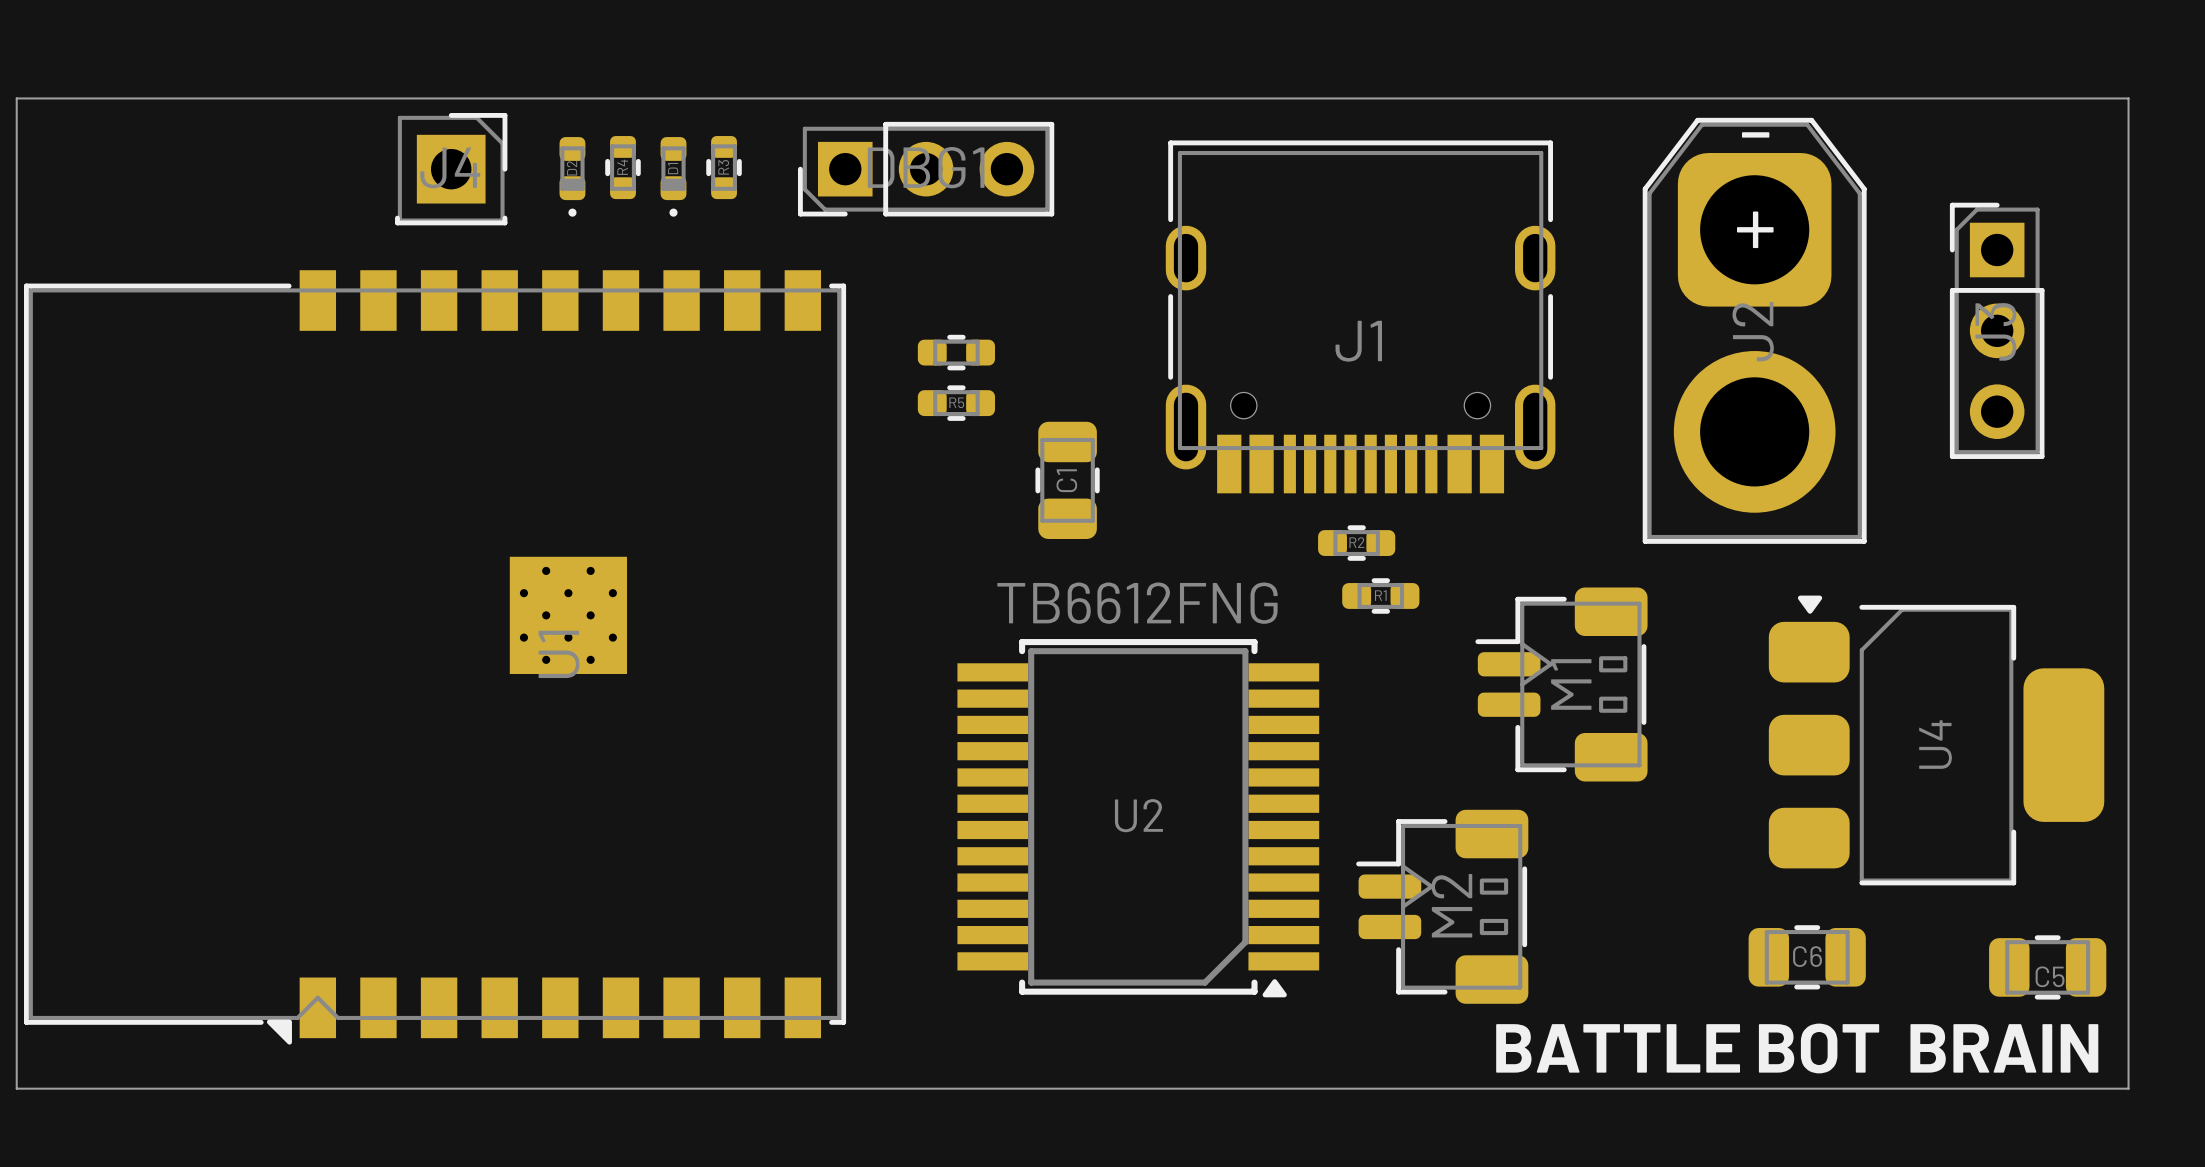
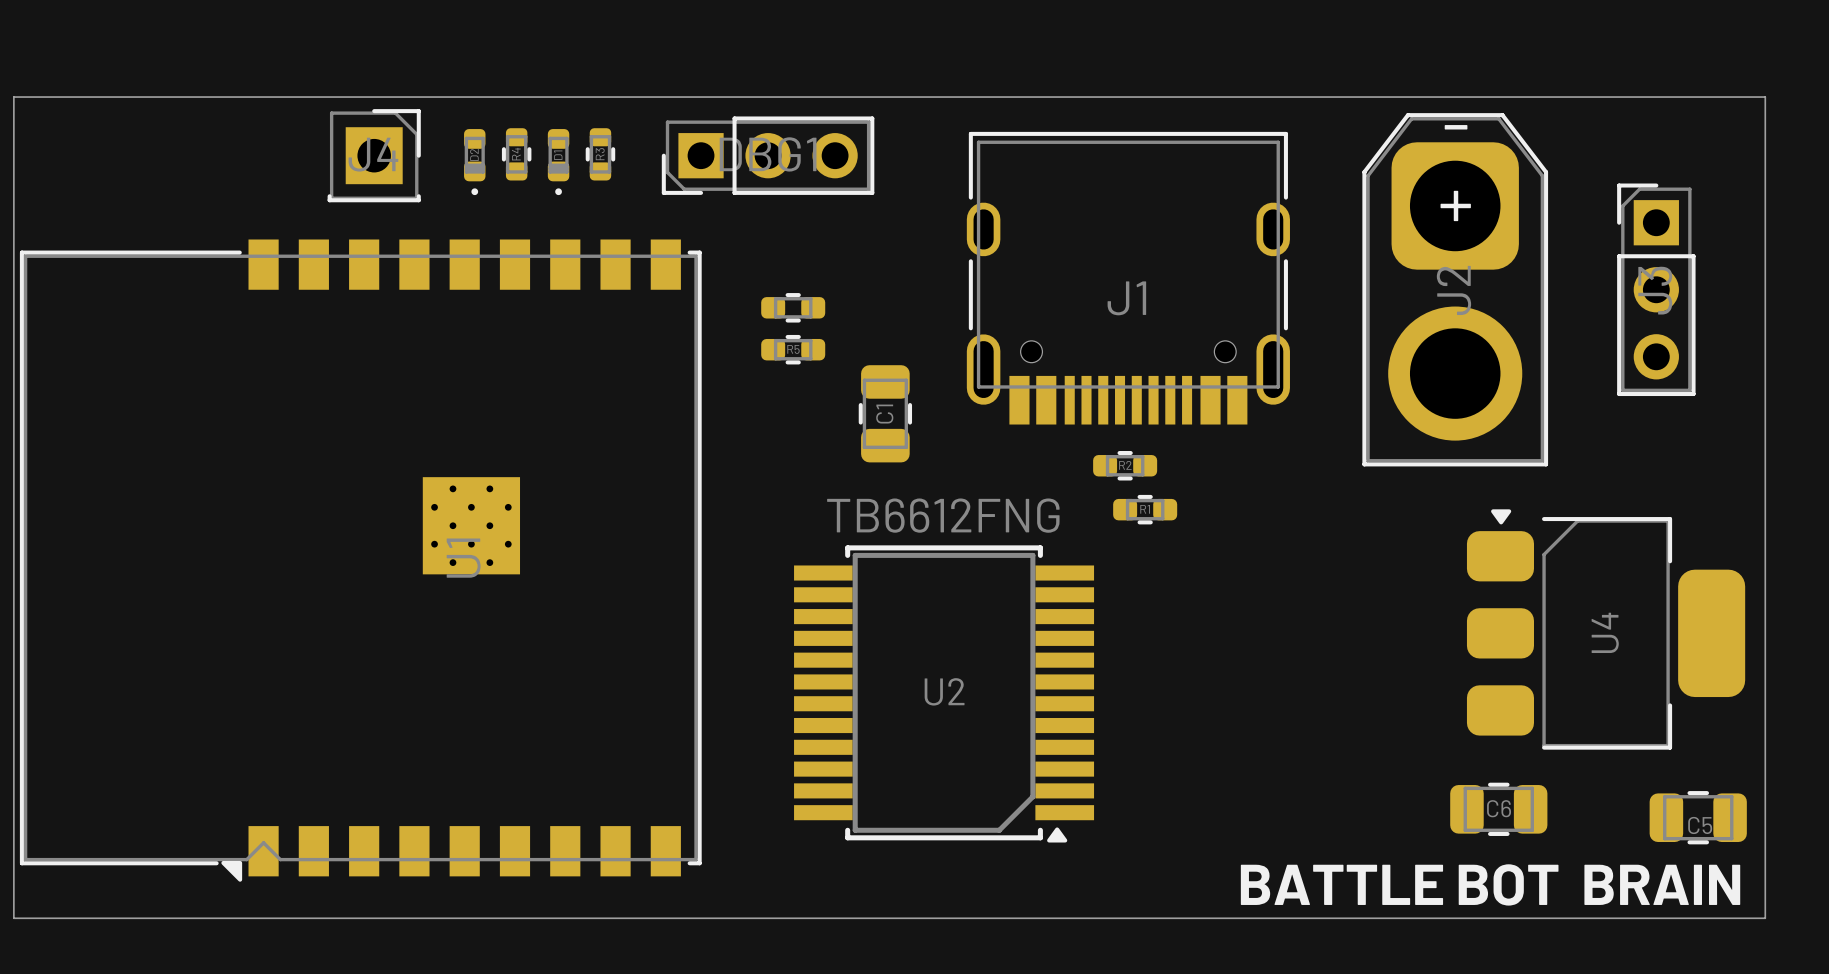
M1: (1561, 684) -> none
M2: (1442, 906) -> none

